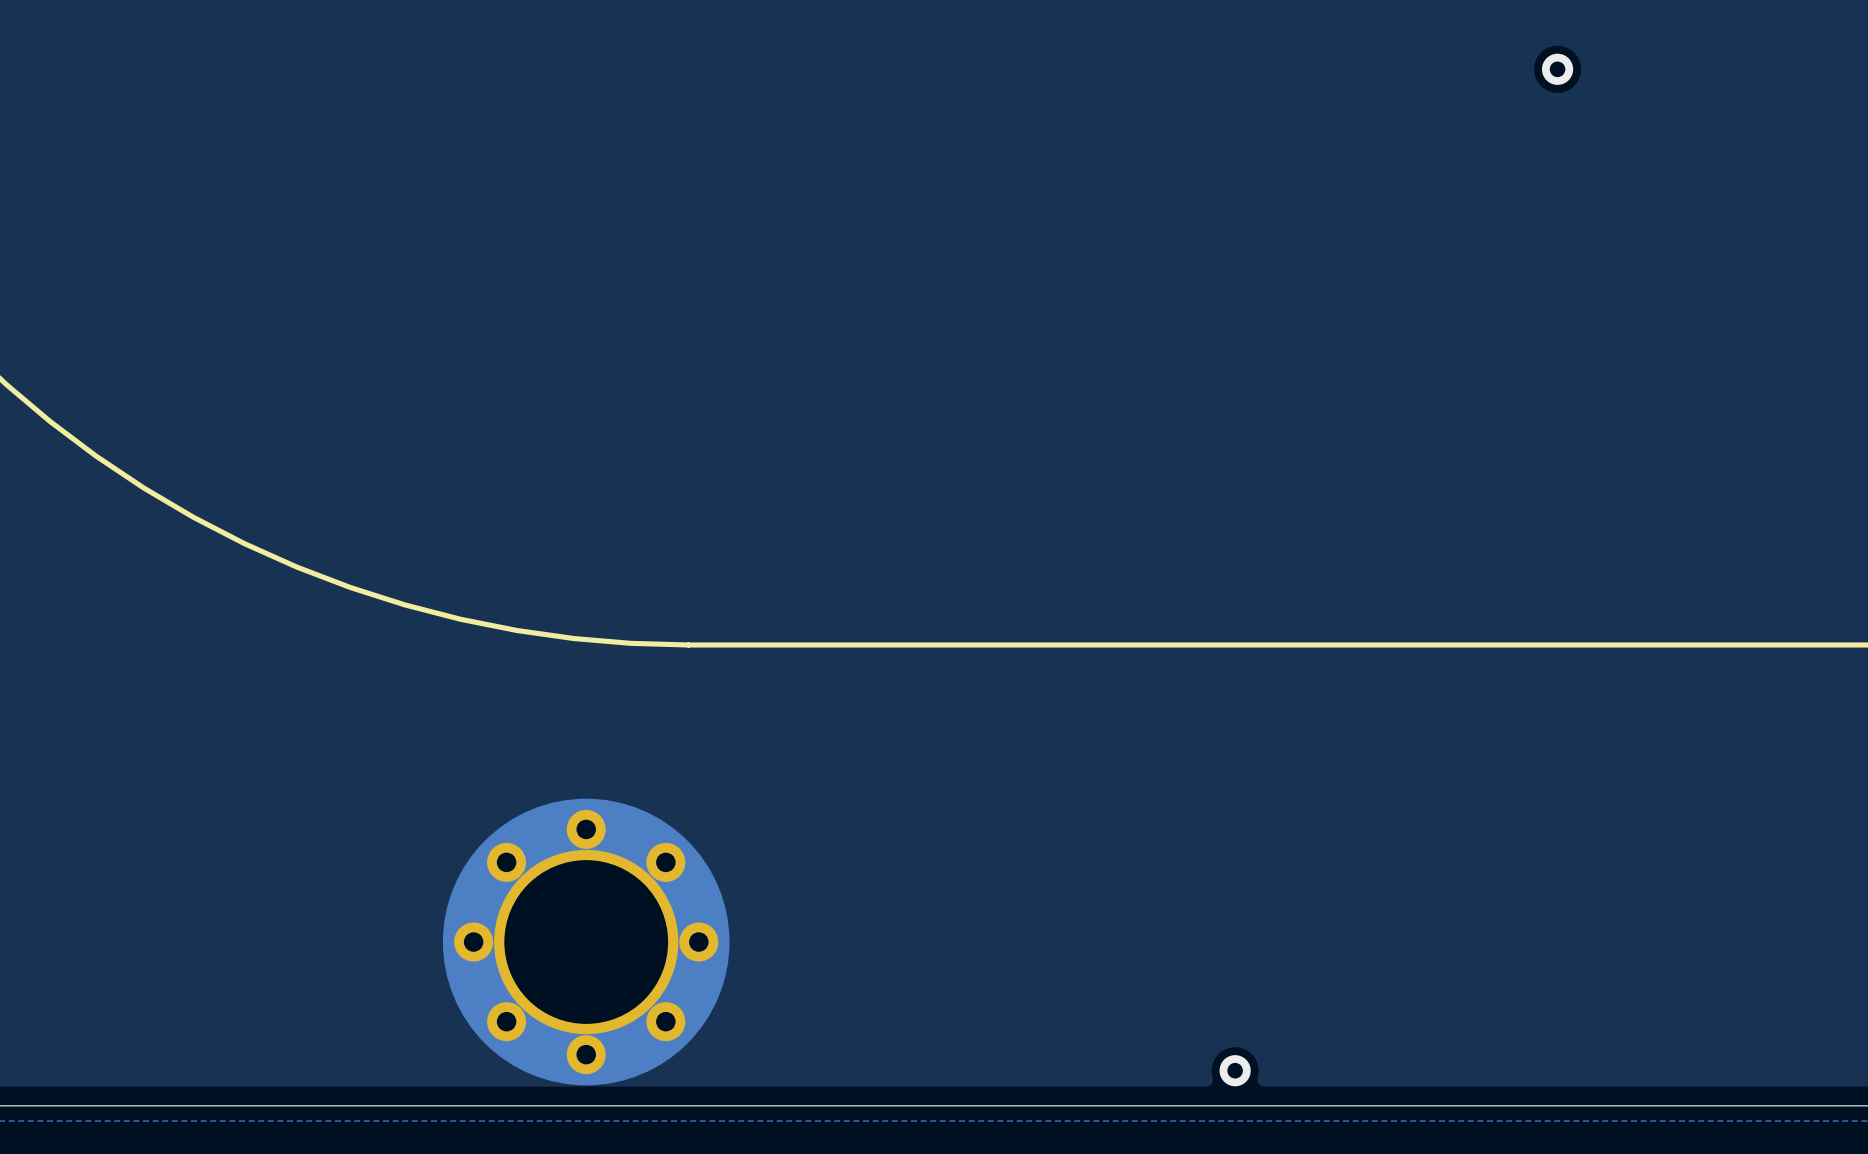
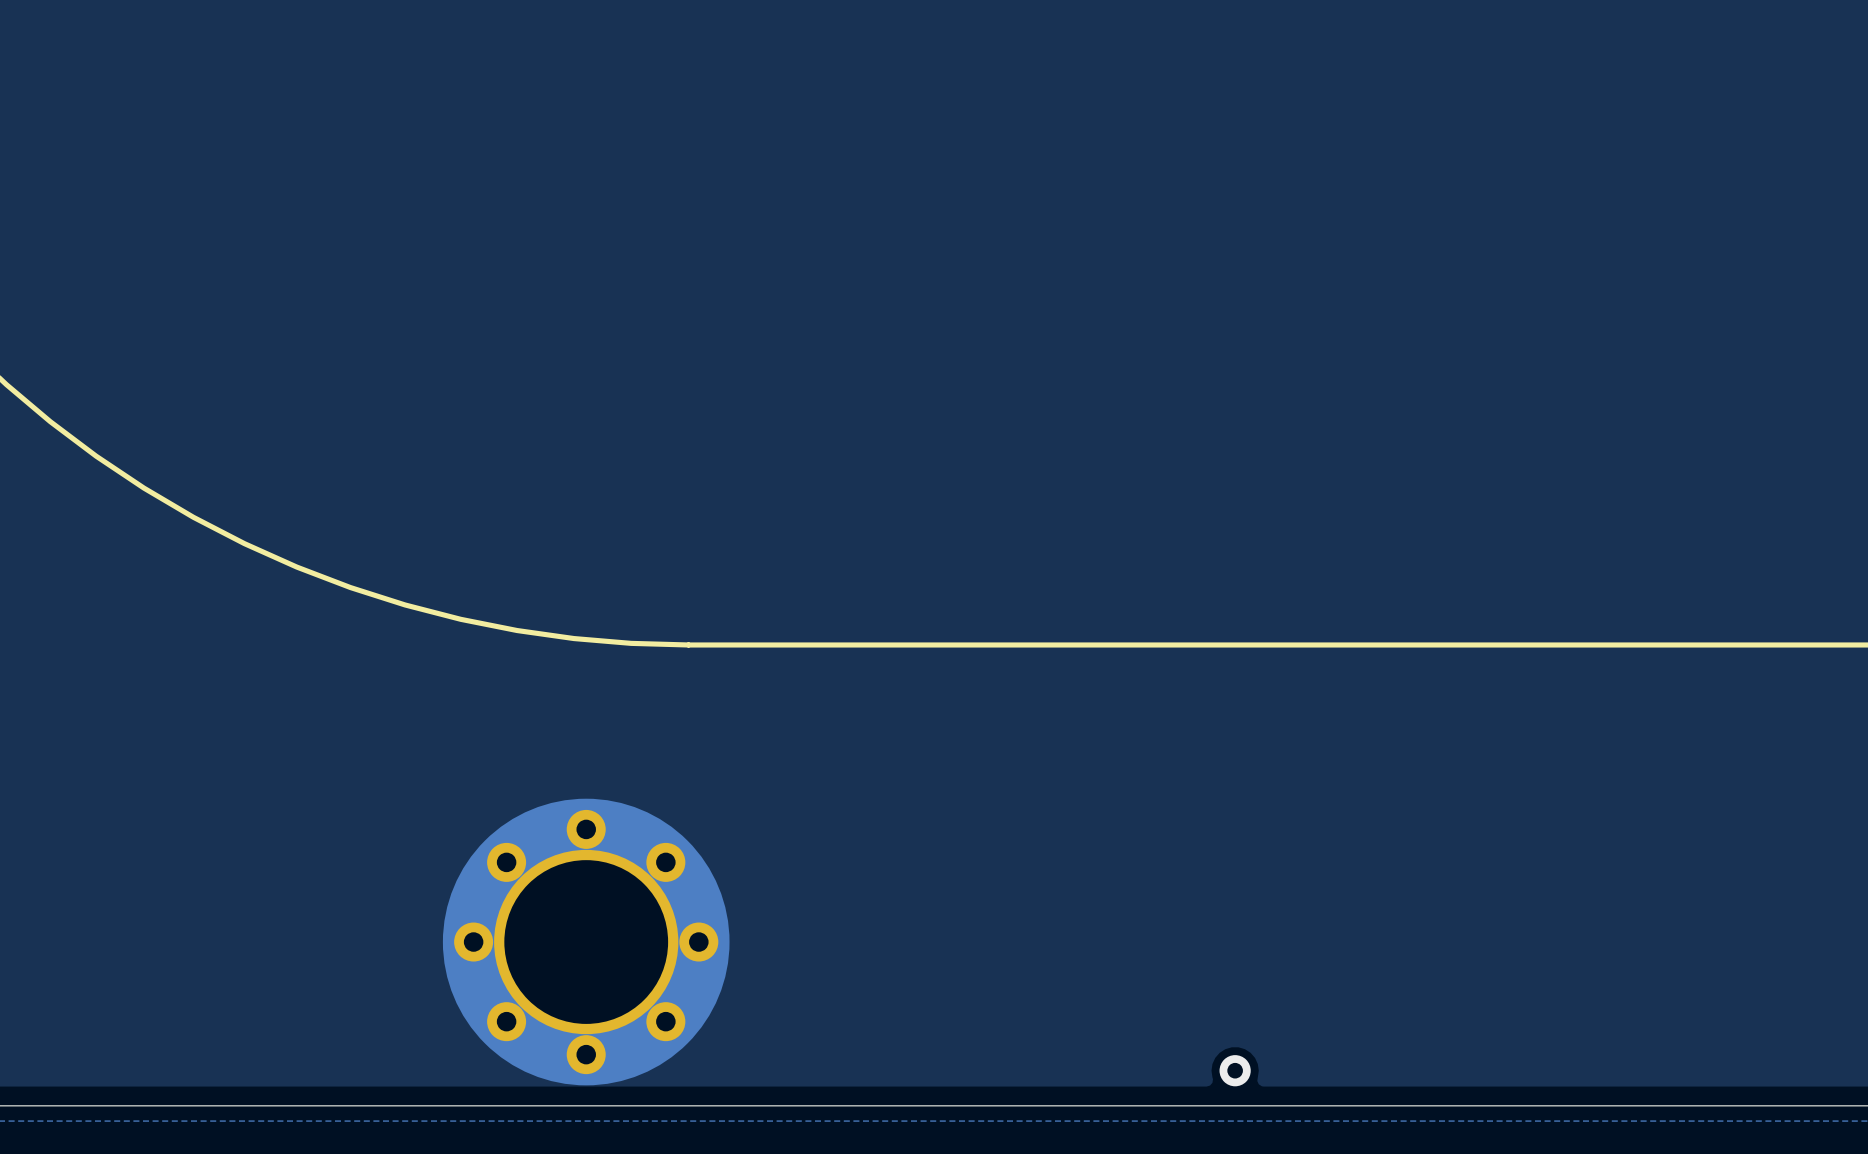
via: (1557, 69) -> none

